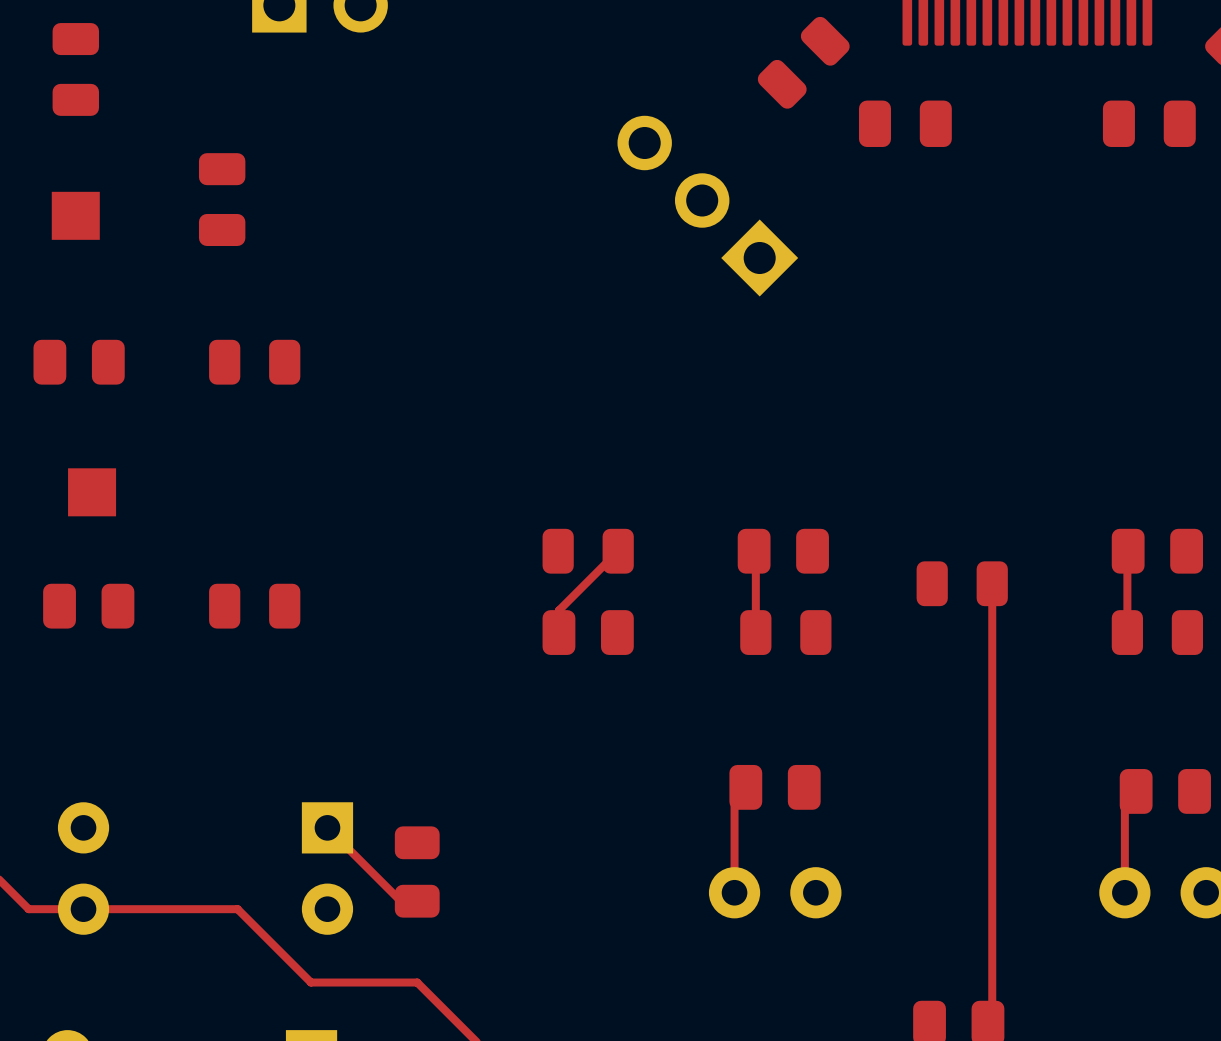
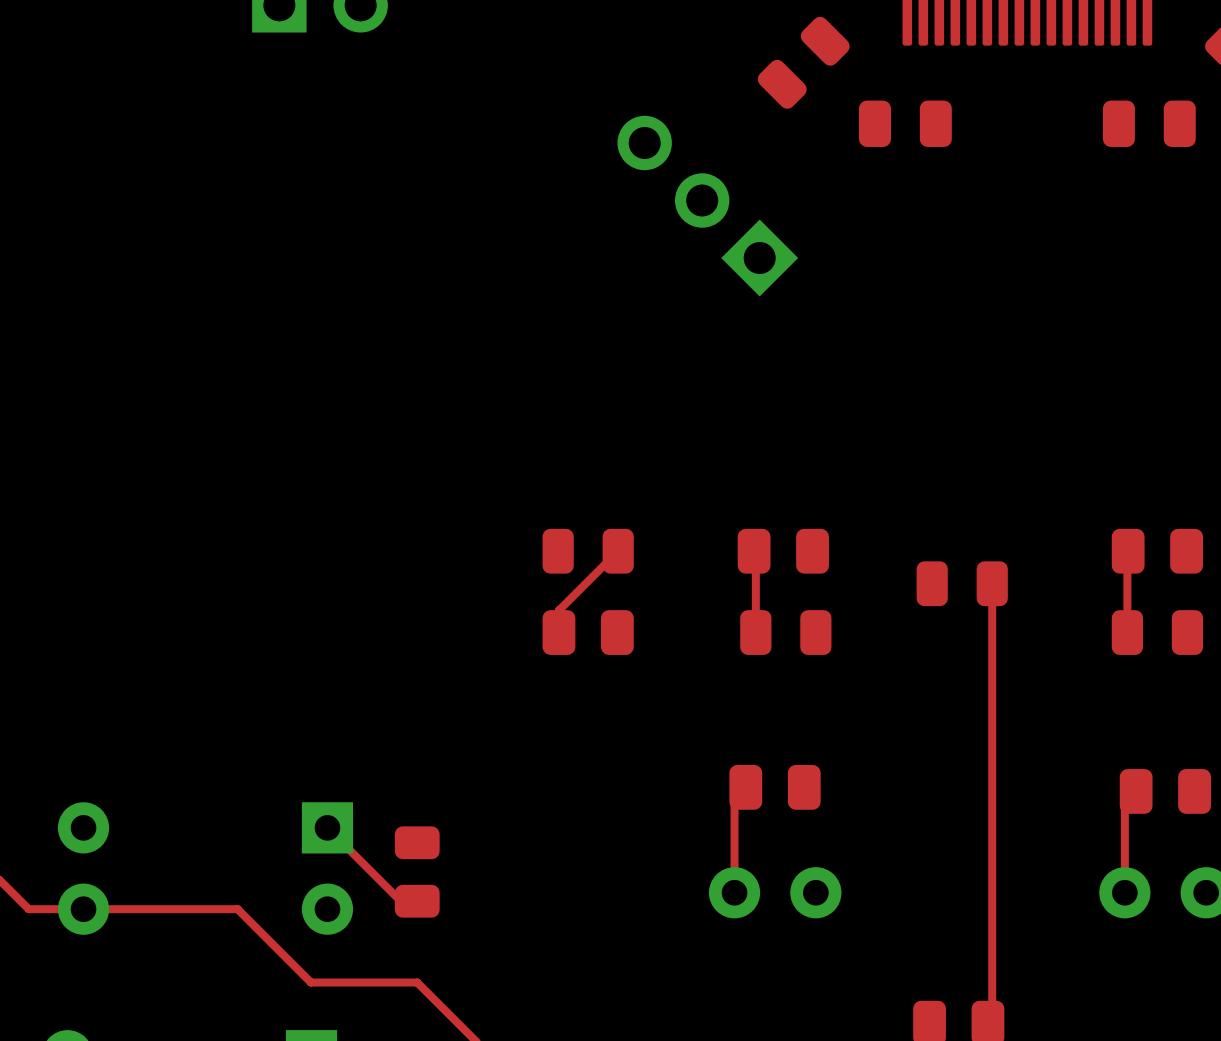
part: (75, 69) -> none
part: (222, 199) -> none
part: (75, 215) -> none
part: (79, 362) -> none
part: (254, 362) -> none
part: (92, 492) -> none
part: (88, 606) -> none
part: (254, 606) -> none

